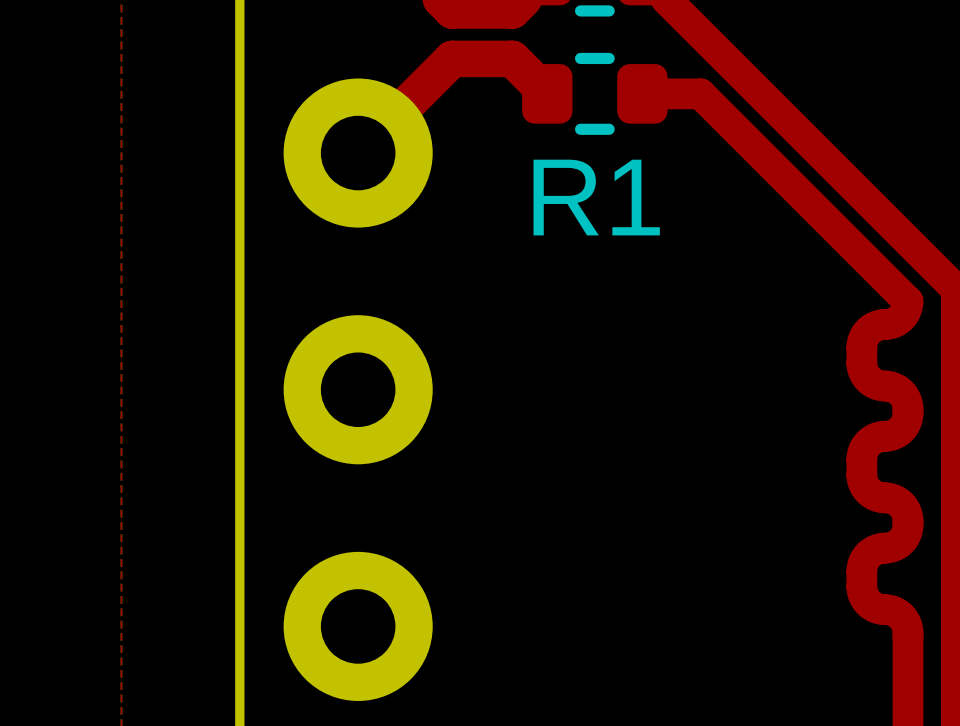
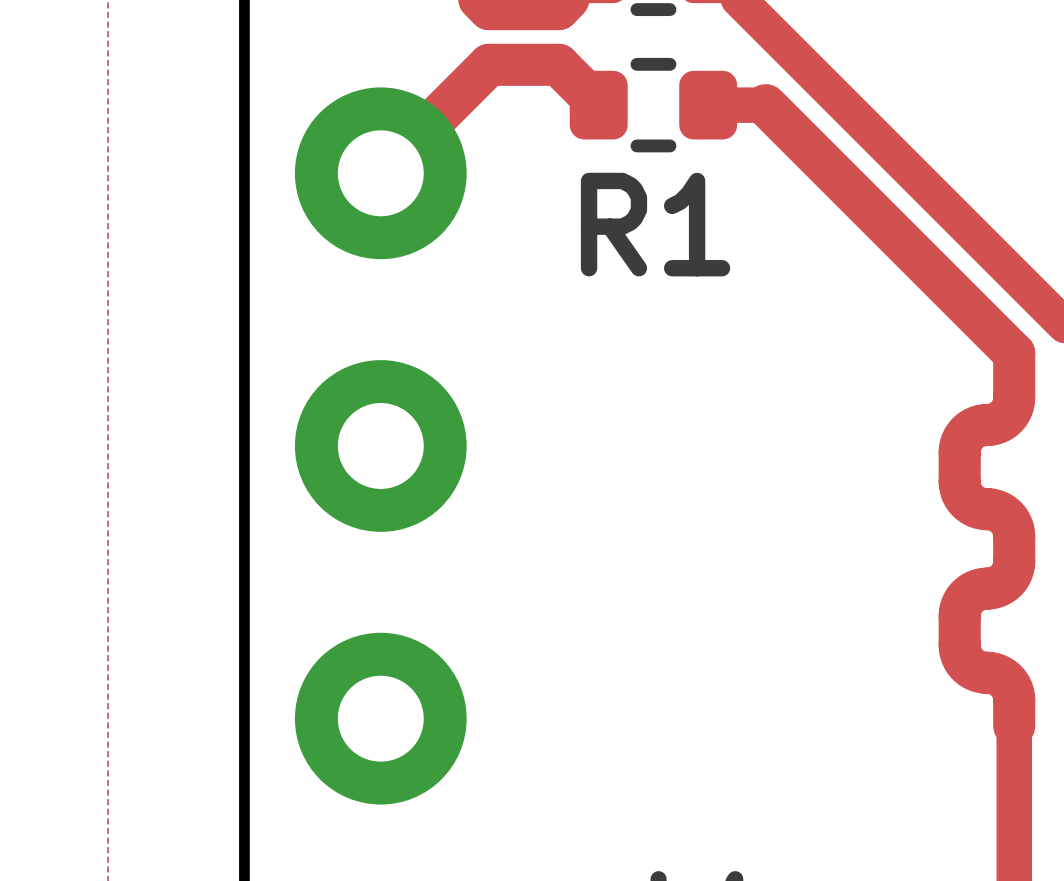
top track: (692, 93) (700, 93) (908, 301) (905, 311) (901, 317) (892, 323) (879, 325) (870, 329) (864, 337) (861, 347) (861, 365) (866, 377) (874, 383) (892, 387) (899, 391) (905, 399) (908, 409) (906, 420) (901, 429) (892, 435) (872, 439) (865, 447) (862, 454) (861, 477) (865, 487) (874, 495) (892, 499) (899, 502) (906, 513) (908, 525) (905, 535) (899, 543) (892, 546) (874, 550) (866, 556) (861, 568) (861, 589) (865, 598) (872, 606) (892, 610) (901, 616) (905, 622) (908, 632) -> (765, 105) (1014, 353) (1014, 397) (1010, 411) (997, 422) (979, 425) (970, 430) (963, 438) (959, 452) (959, 481) (961, 492) (973, 505) (997, 511) (1008, 519) (1014, 532) (1014, 564) (1010, 574) (1003, 582) (994, 587) (976, 590) (965, 599) (959, 612) (959, 645) (963, 659) (970, 667) (979, 671) (997, 674) (1008, 683) (1014, 696) (1014, 725)

